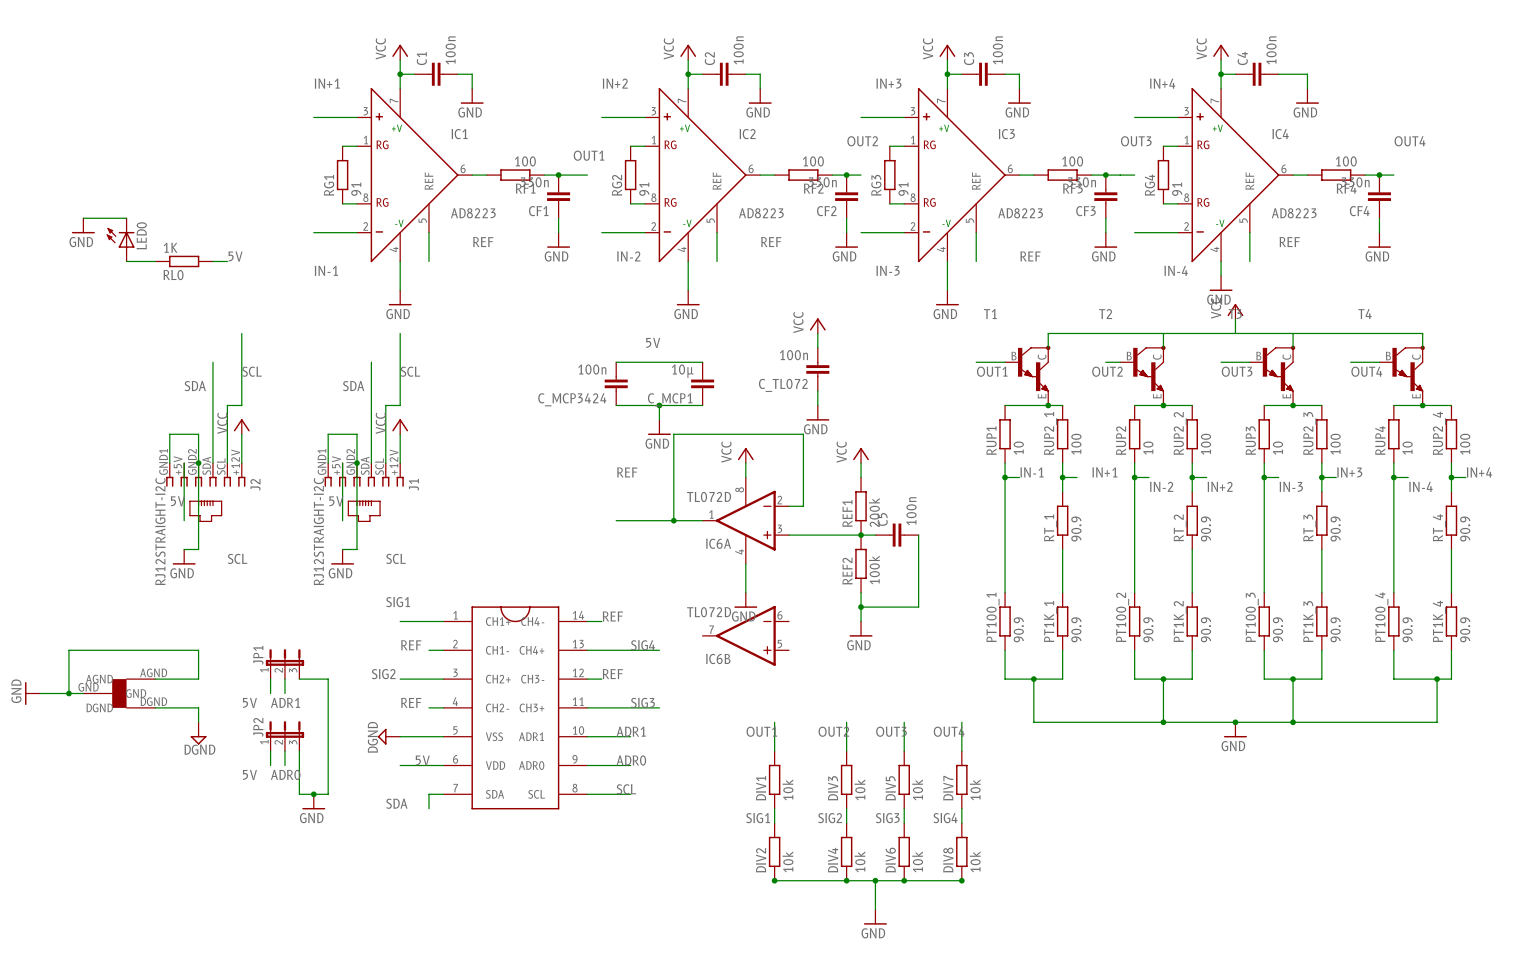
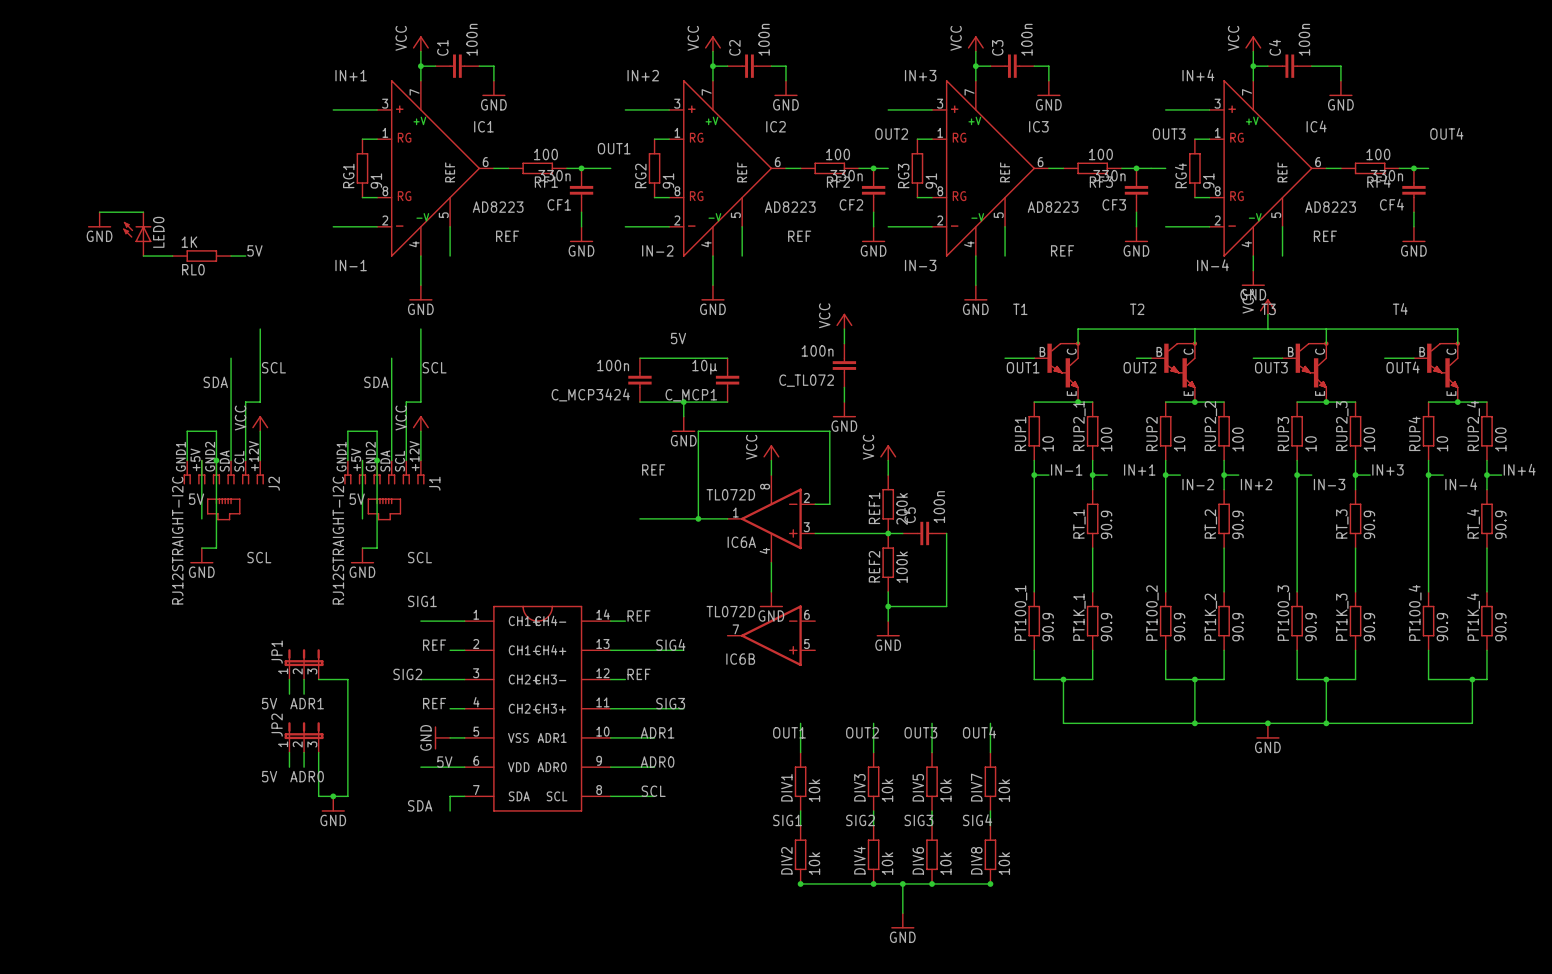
wire: (155, 679) (198, 679) (198, 650) (68, 650) (68, 693) -> none
power symbol: GND (32, 693) -> none
wire: (40, 693) (83, 693) -> none
junction: (68, 693) -> none
part: (119, 693) -> none
wire: (155, 707) (198, 707) (198, 722) -> none
power symbol: DGND (198, 733) -> none
power symbol: DGND (389, 736) -> none
power symbol: none -> GND (442, 737)

